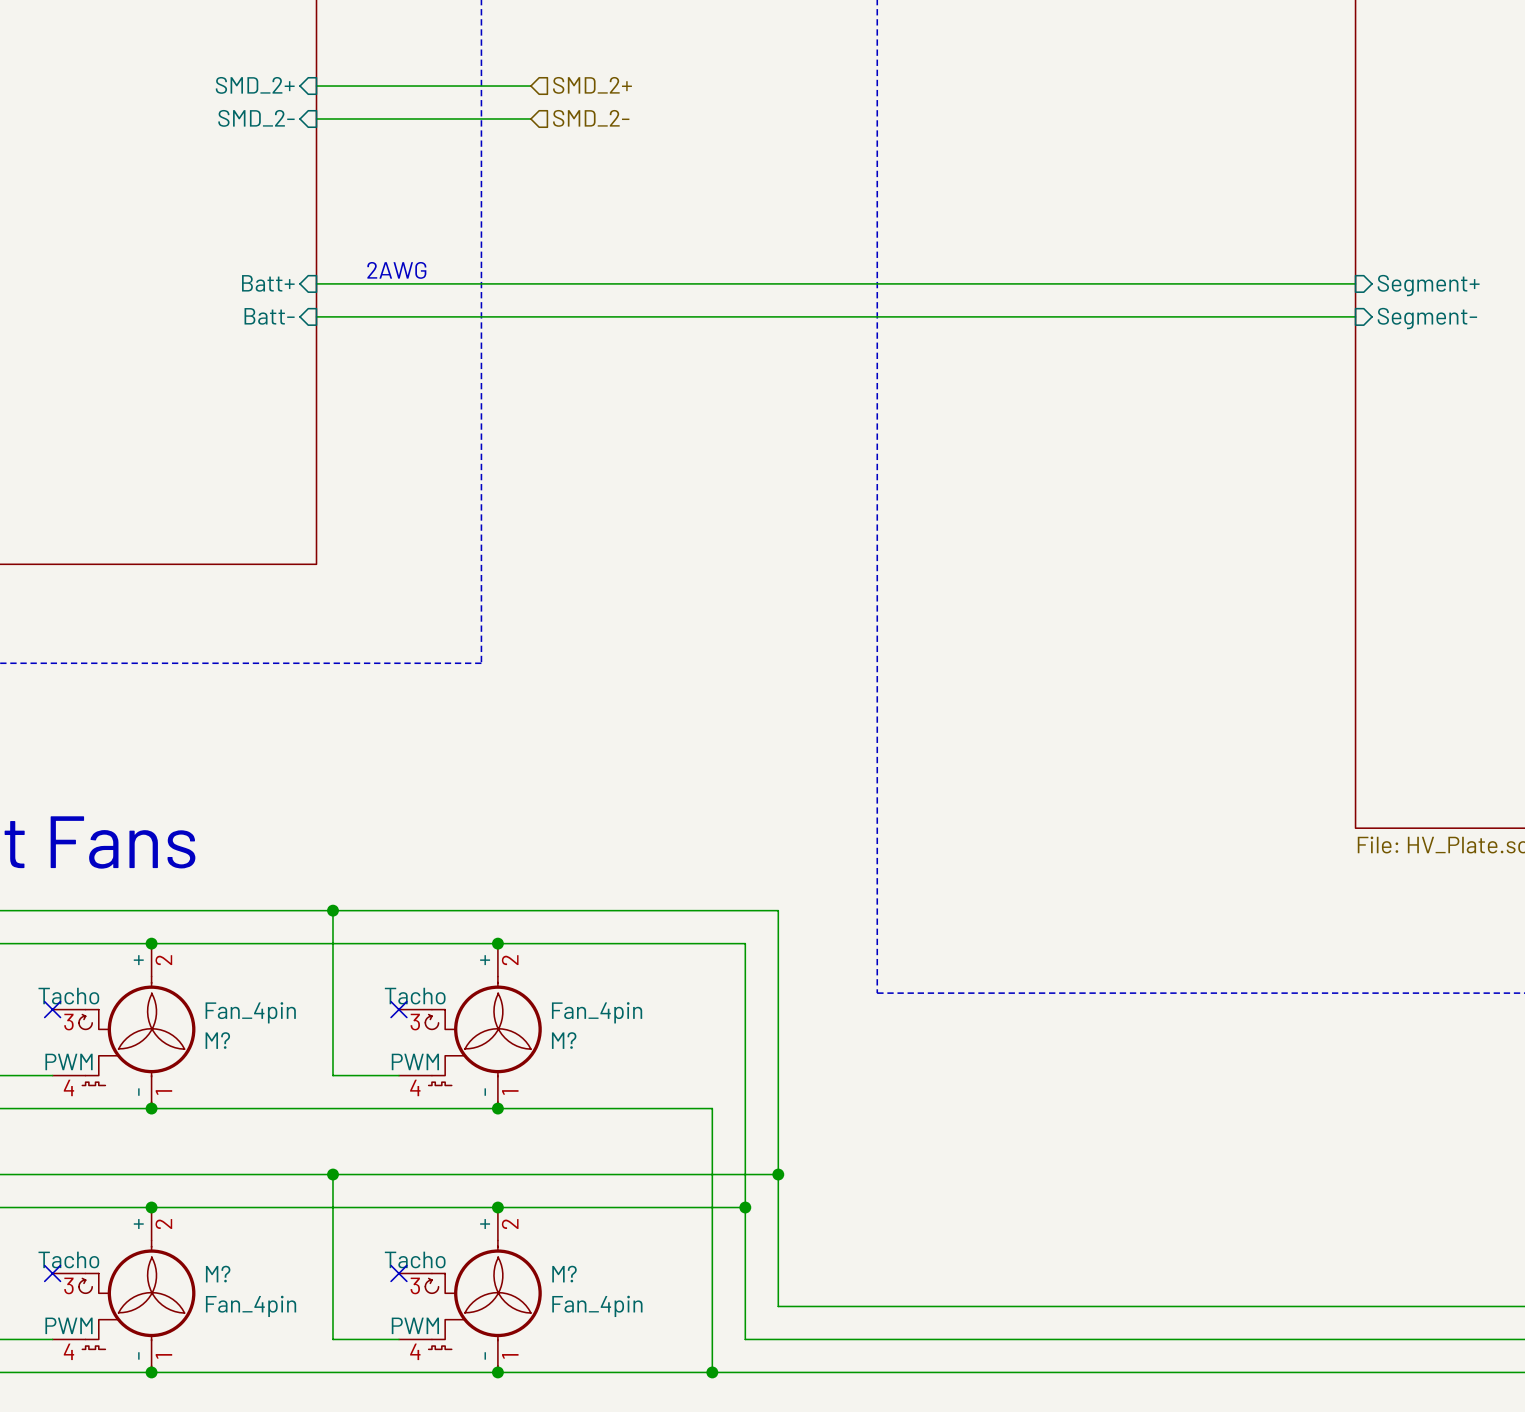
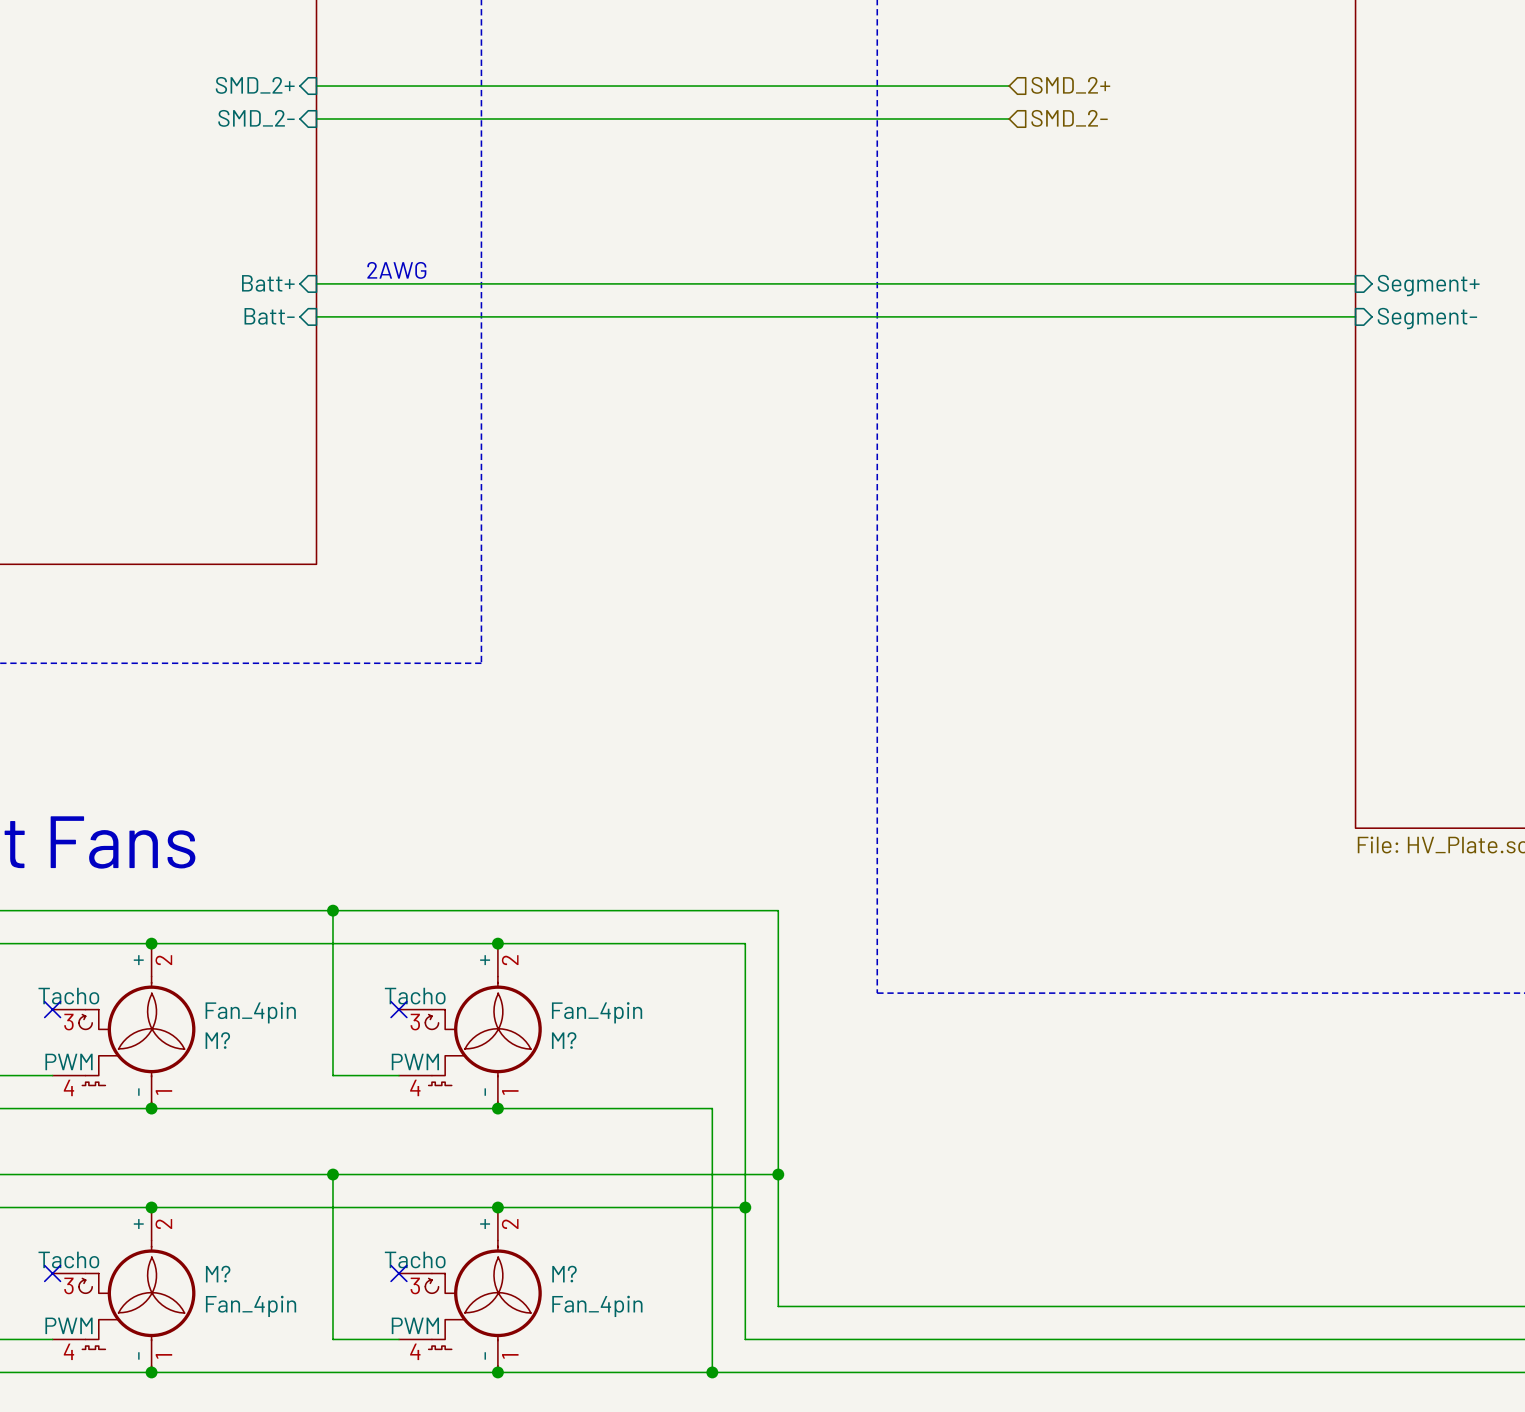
hierarchical label: SMD_2+ (592, 85) -> none
hierarchical label: none -> SMD_2+ (1070, 85)
wire: none -> (530, 86) (1009, 86)
wire: none -> (530, 118) (1009, 118)
hierarchical label: SMD_2- (591, 118) -> none
hierarchical label: none -> SMD_2- (1069, 118)

